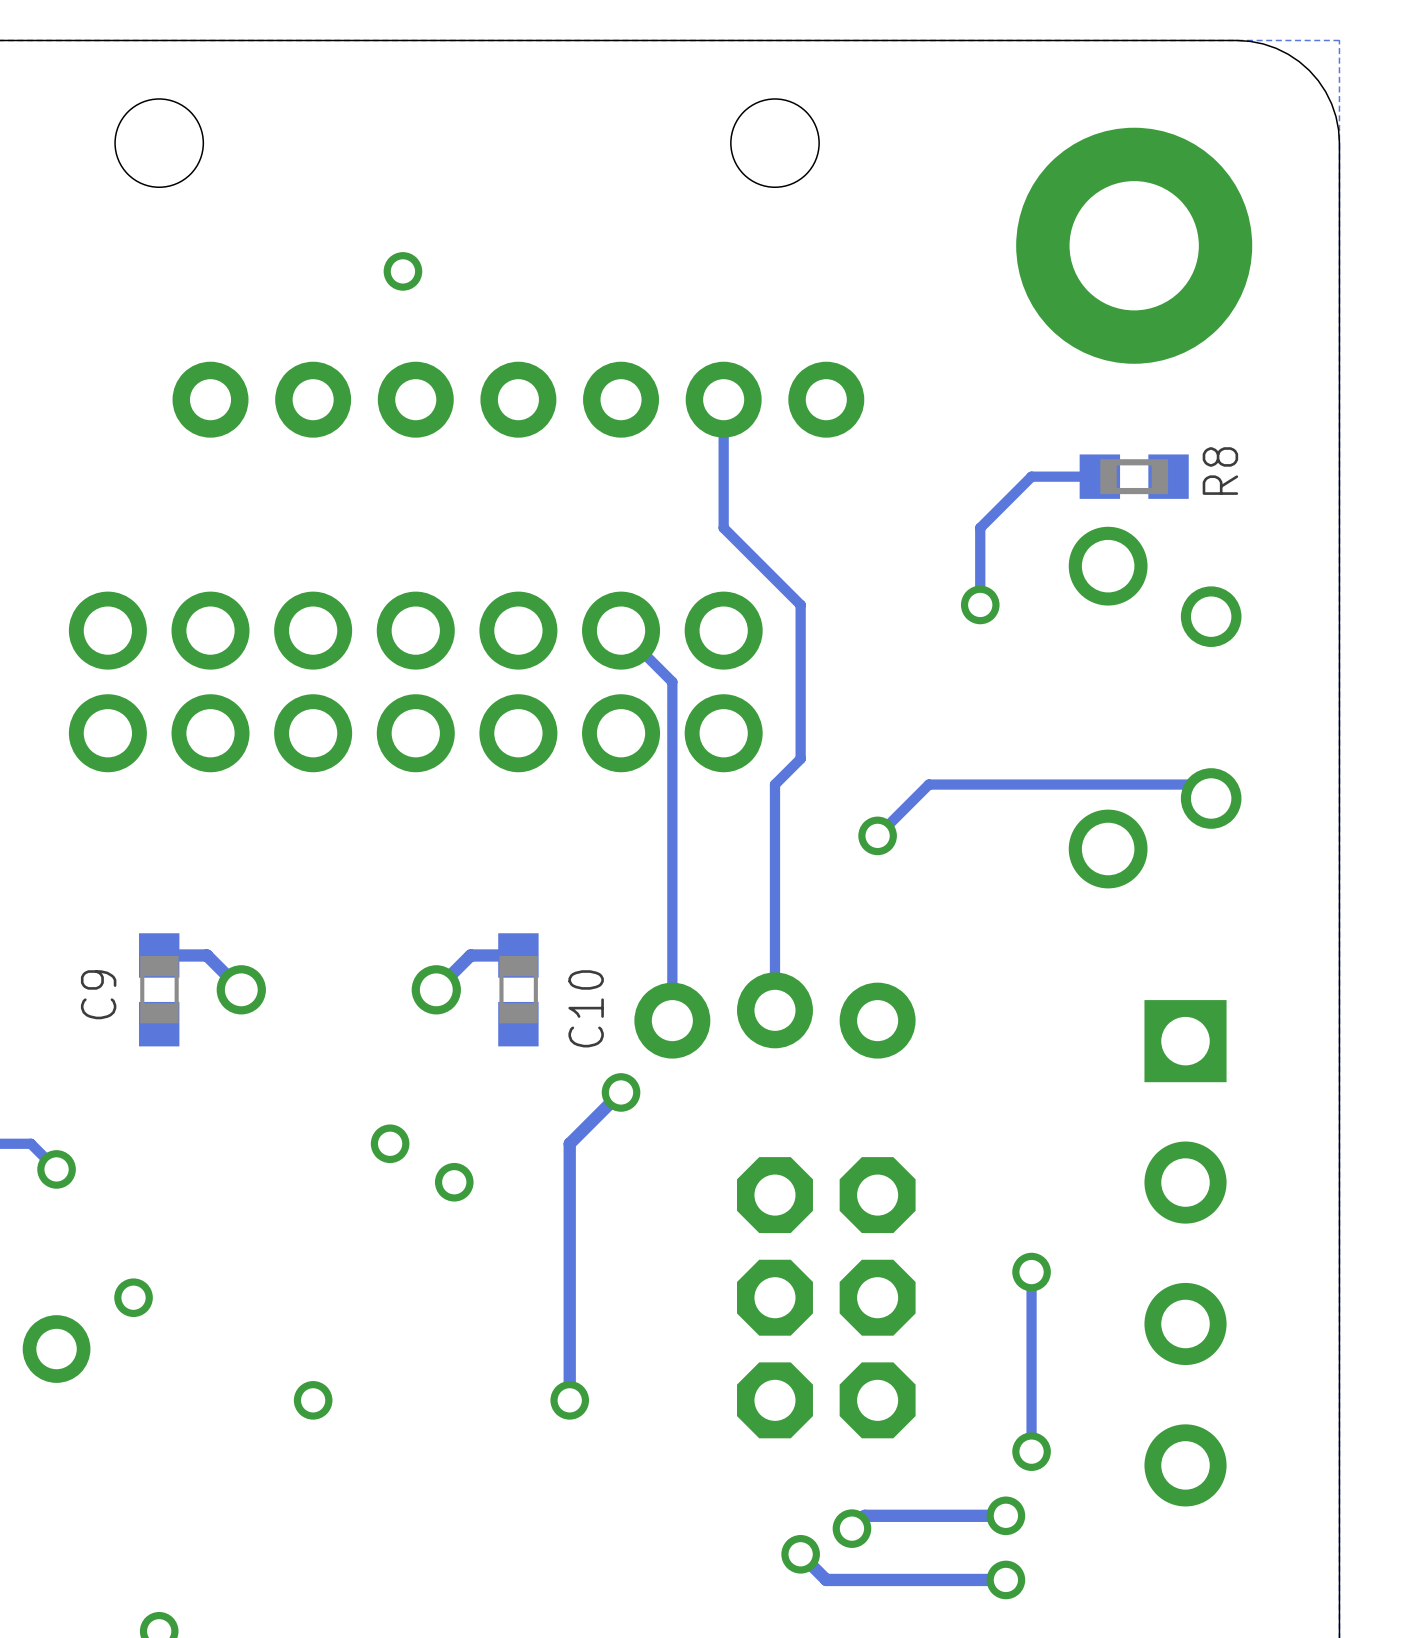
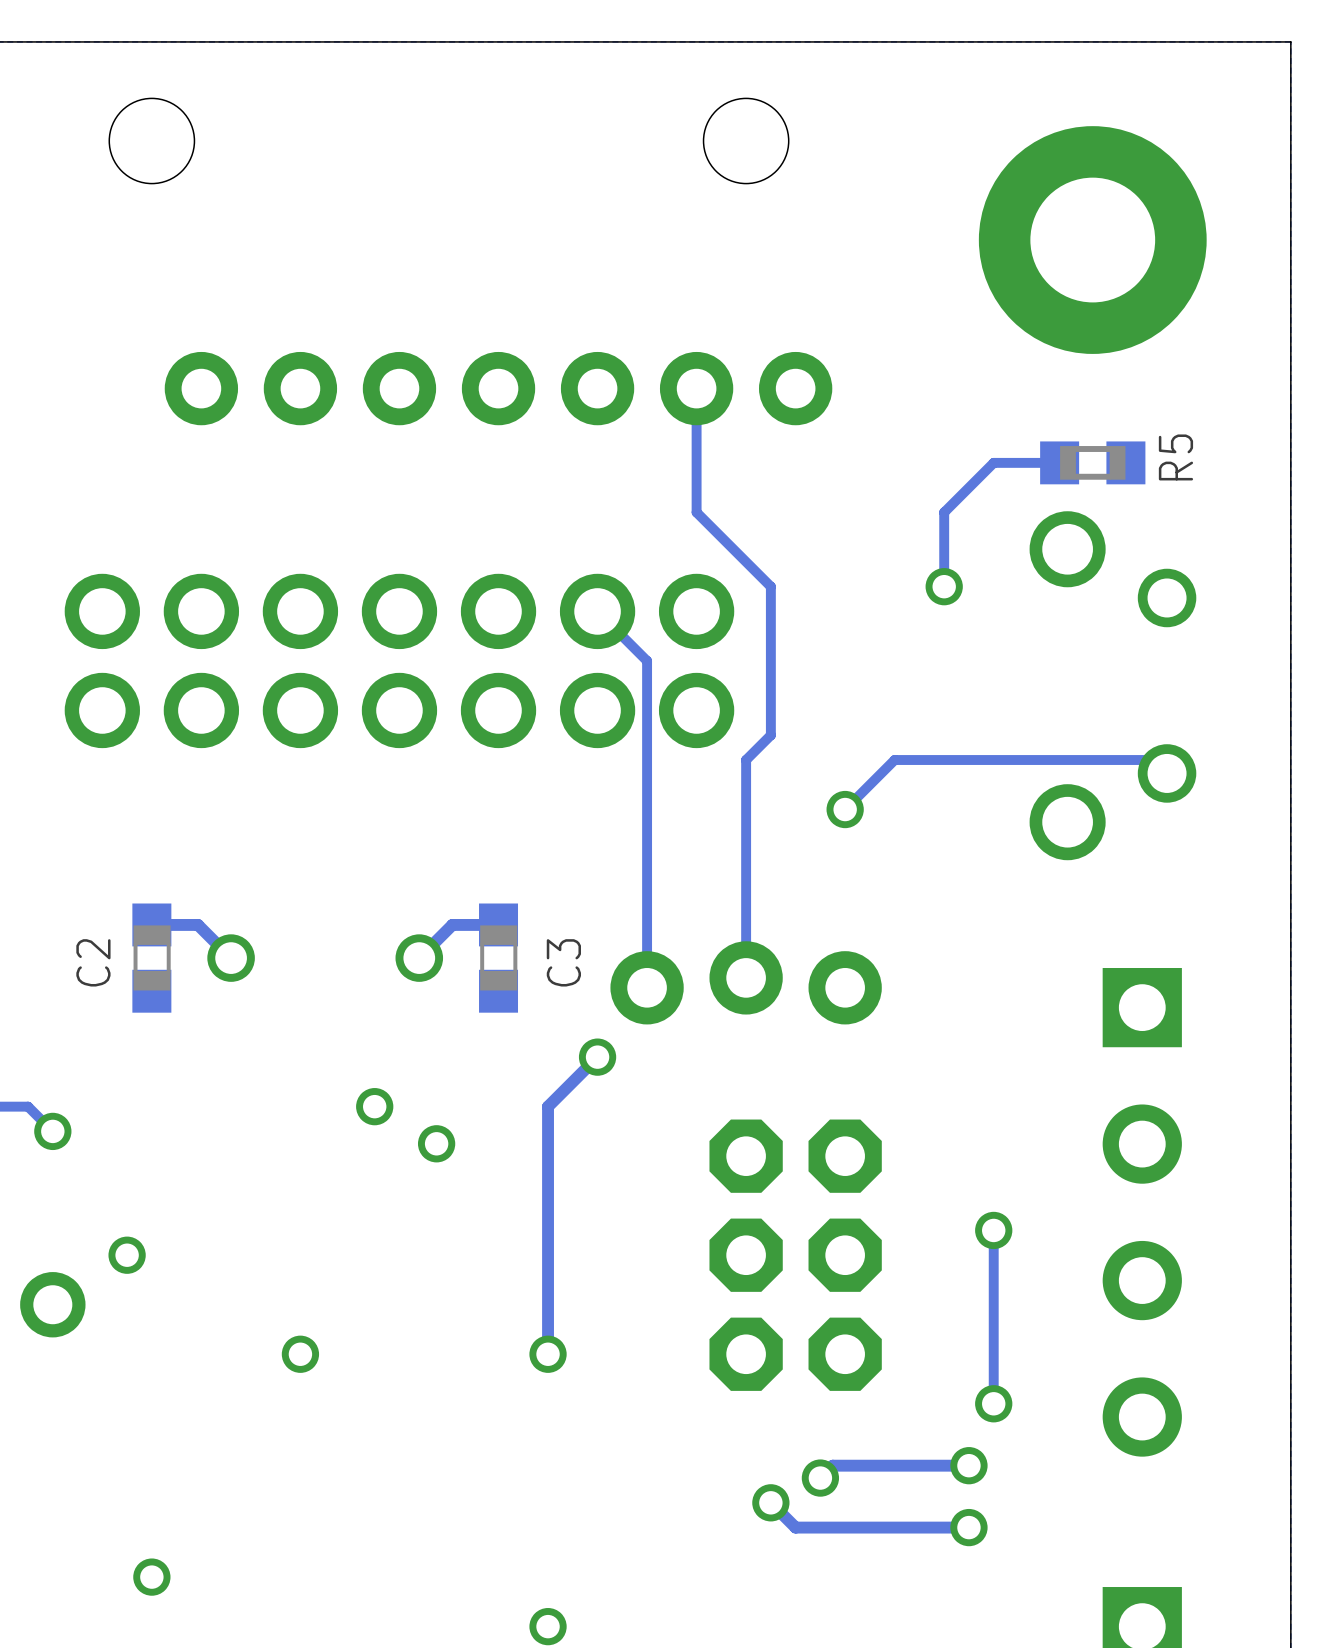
board edge: (1236, 40) (1263, 43) (1276, 48) (1299, 61) (1309, 70) (1318, 80) (1331, 103) (1335, 116) (1339, 143) -> (1191, 41) (1290, 41) (1290, 140)
via: (402, 271) -> none
R8 name: R8 (1220, 471) -> R5 (1175, 457)
C9 name: C9 (98, 994) -> C2 (93, 962)
C10 name: C10 (586, 1008) -> C3 (563, 962)

